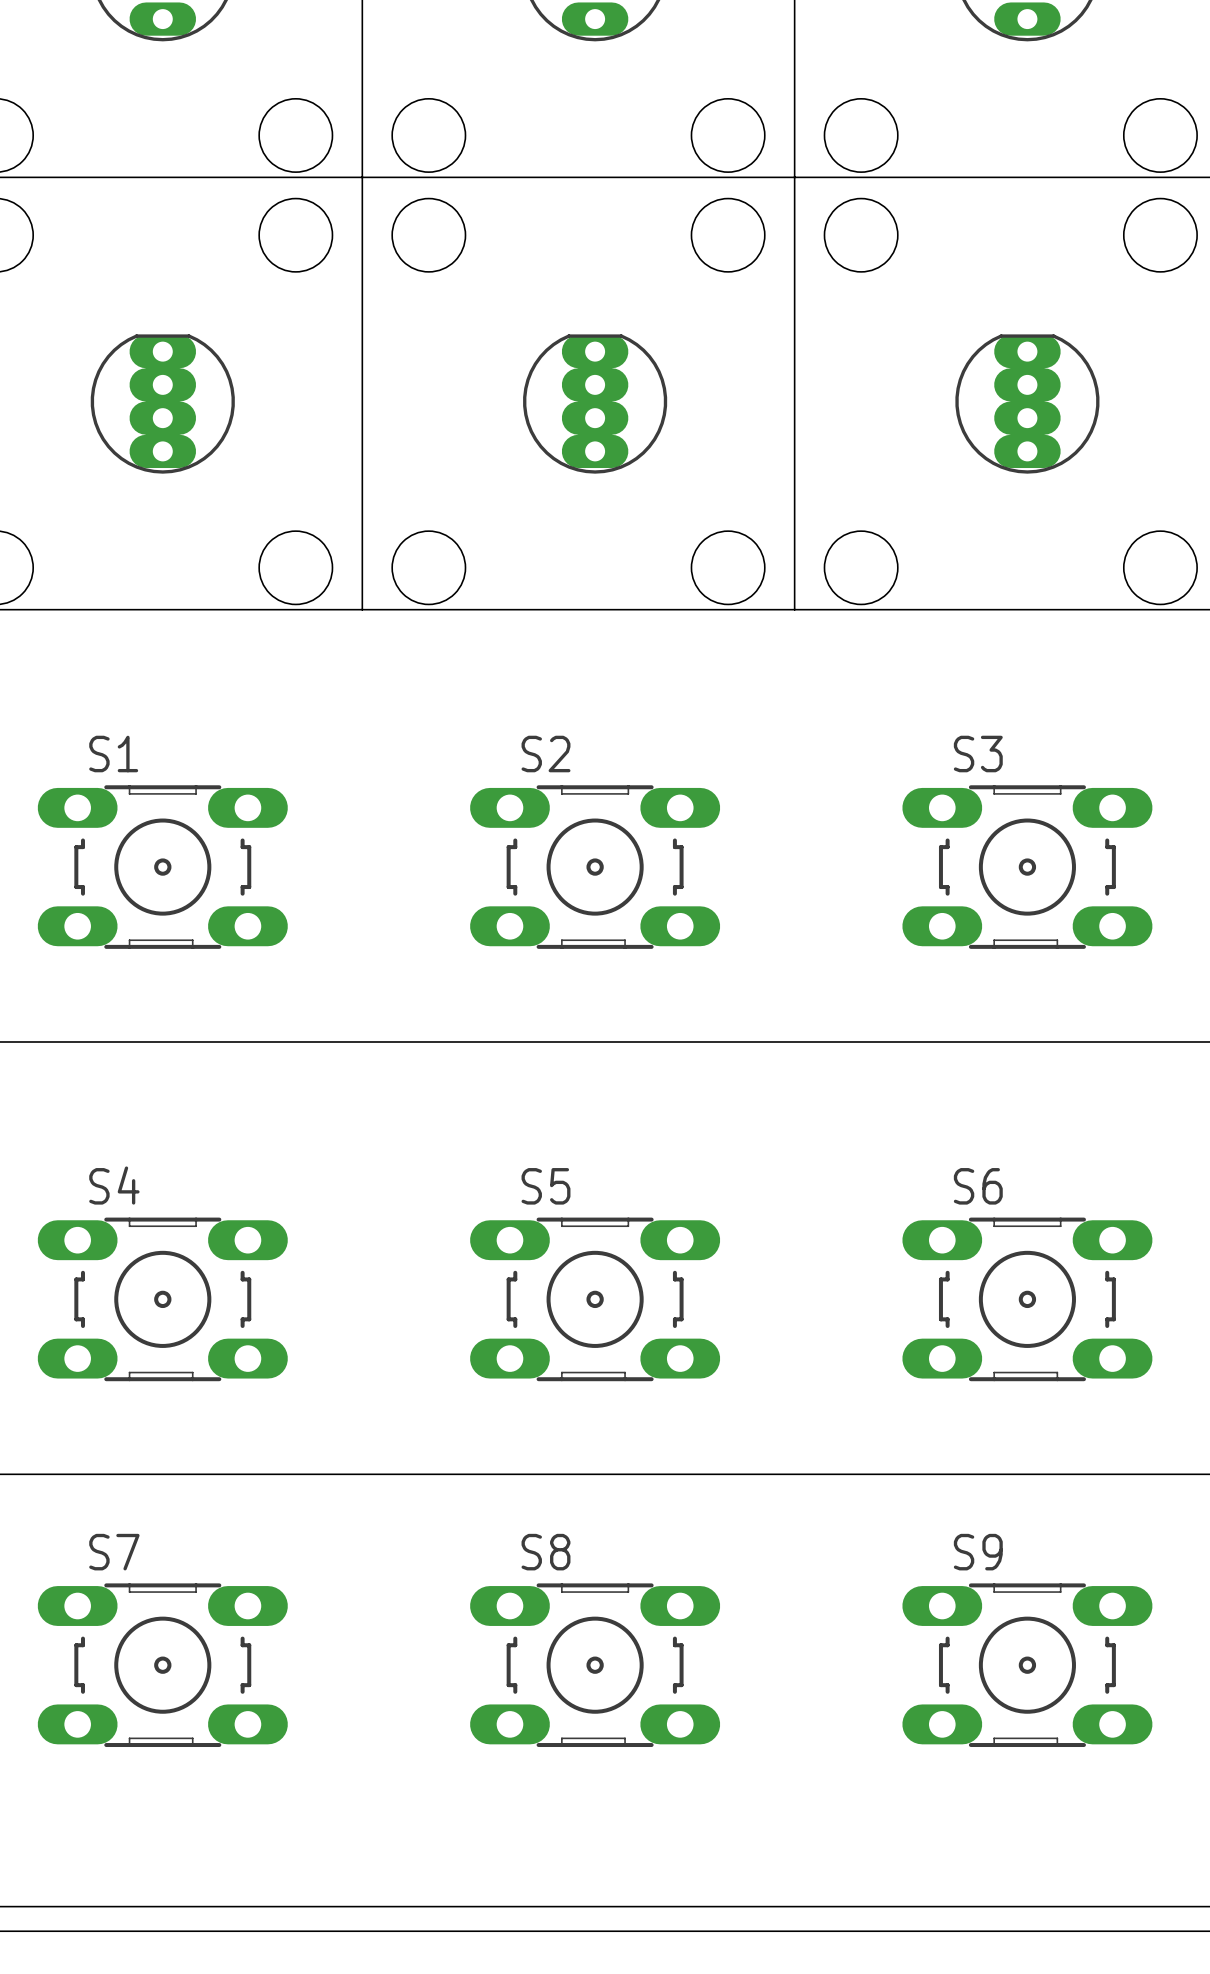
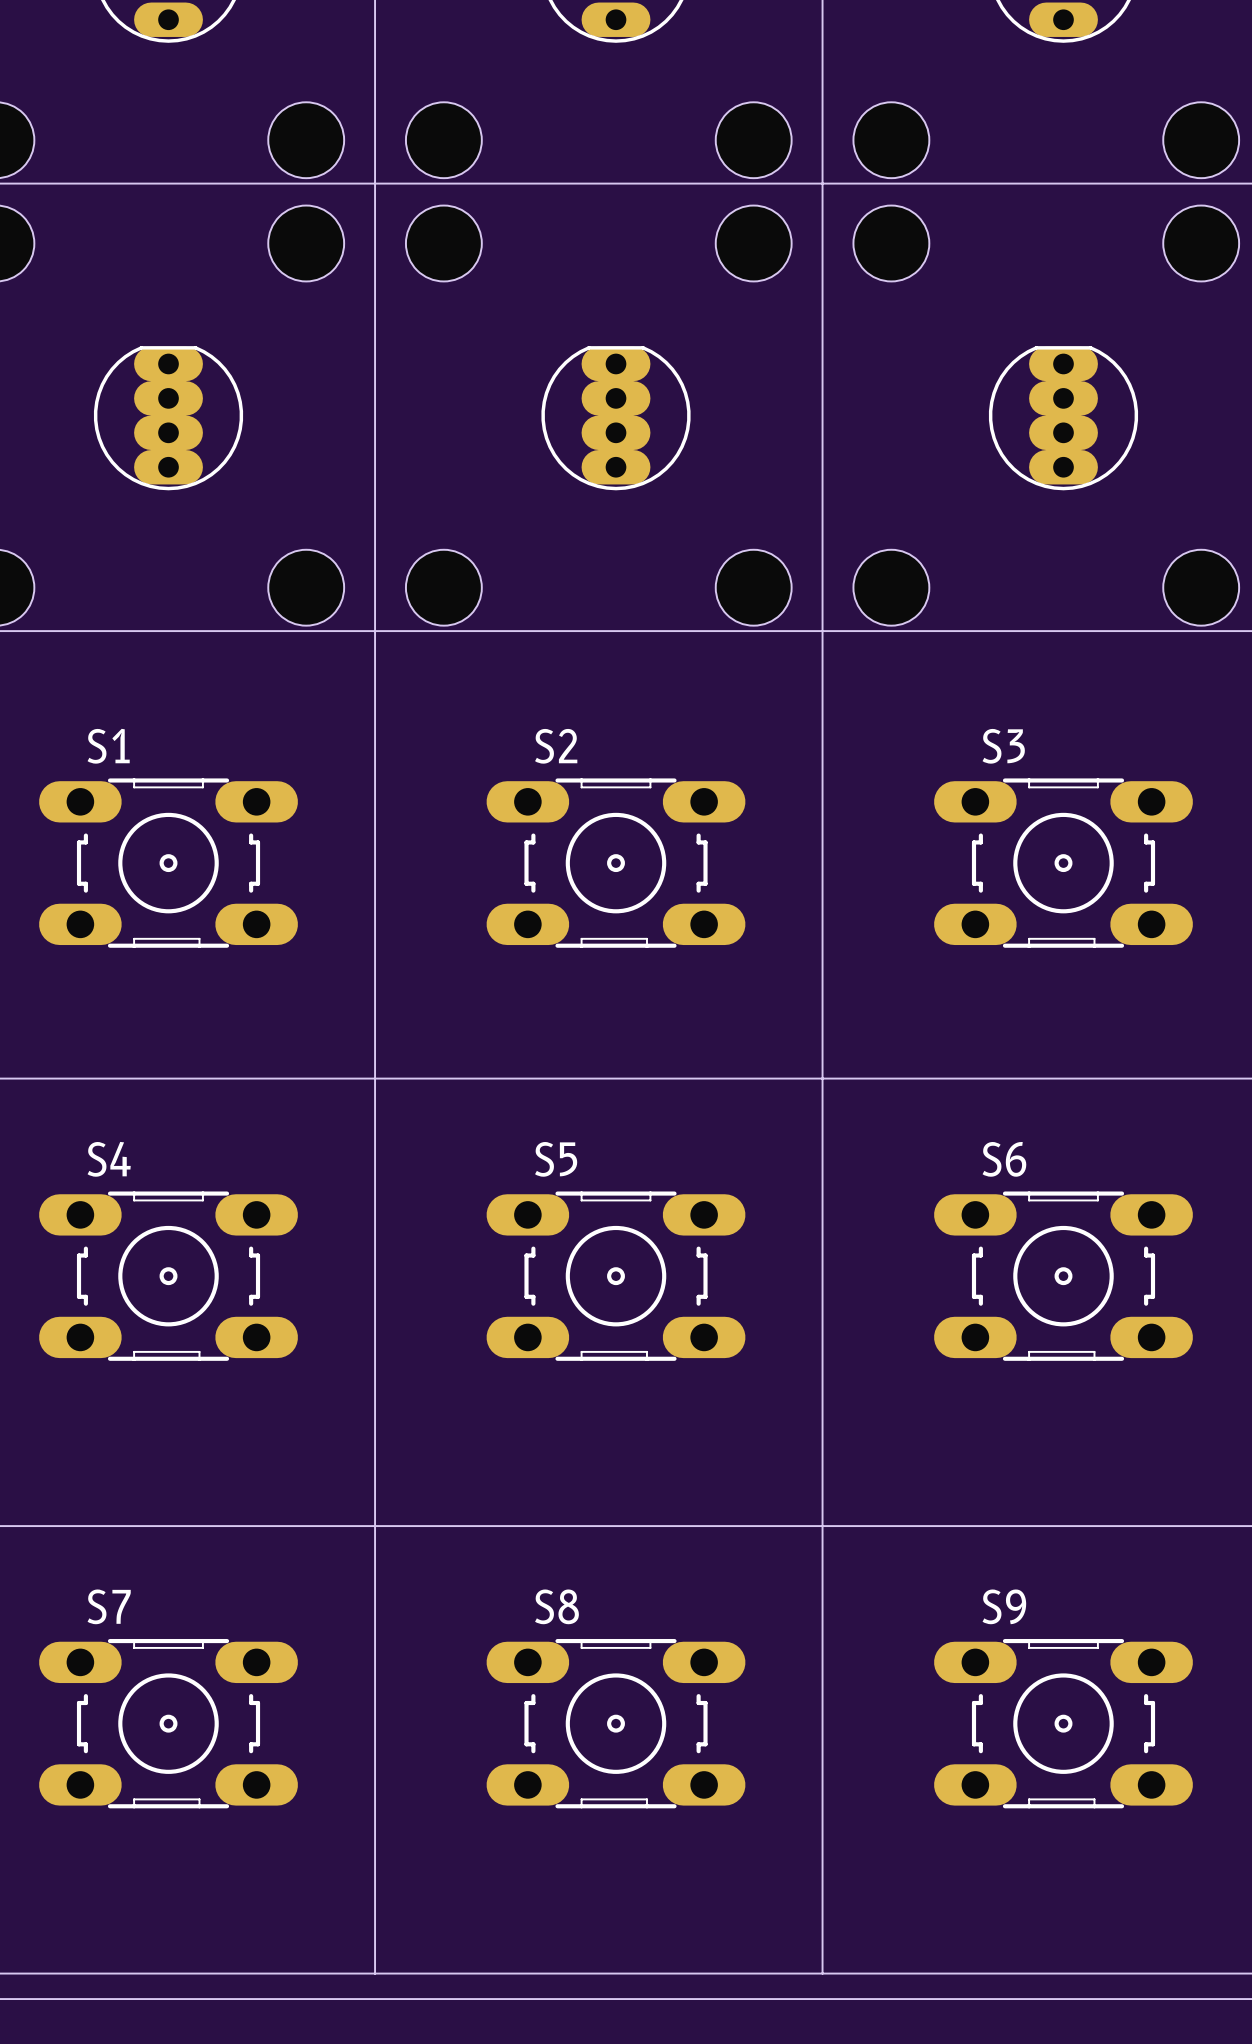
board edge: none -> (375, 631) (375, 1973)
board edge: none -> (822, 631) (822, 1973)
S1 position: (162, 867) -> (168, 863)
S2 position: (595, 867) -> (616, 863)
S3 position: (1027, 867) -> (1063, 863)
S4 position: (162, 1299) -> (168, 1276)
S5 position: (595, 1299) -> (616, 1276)
S6 position: (1027, 1299) -> (1063, 1276)

